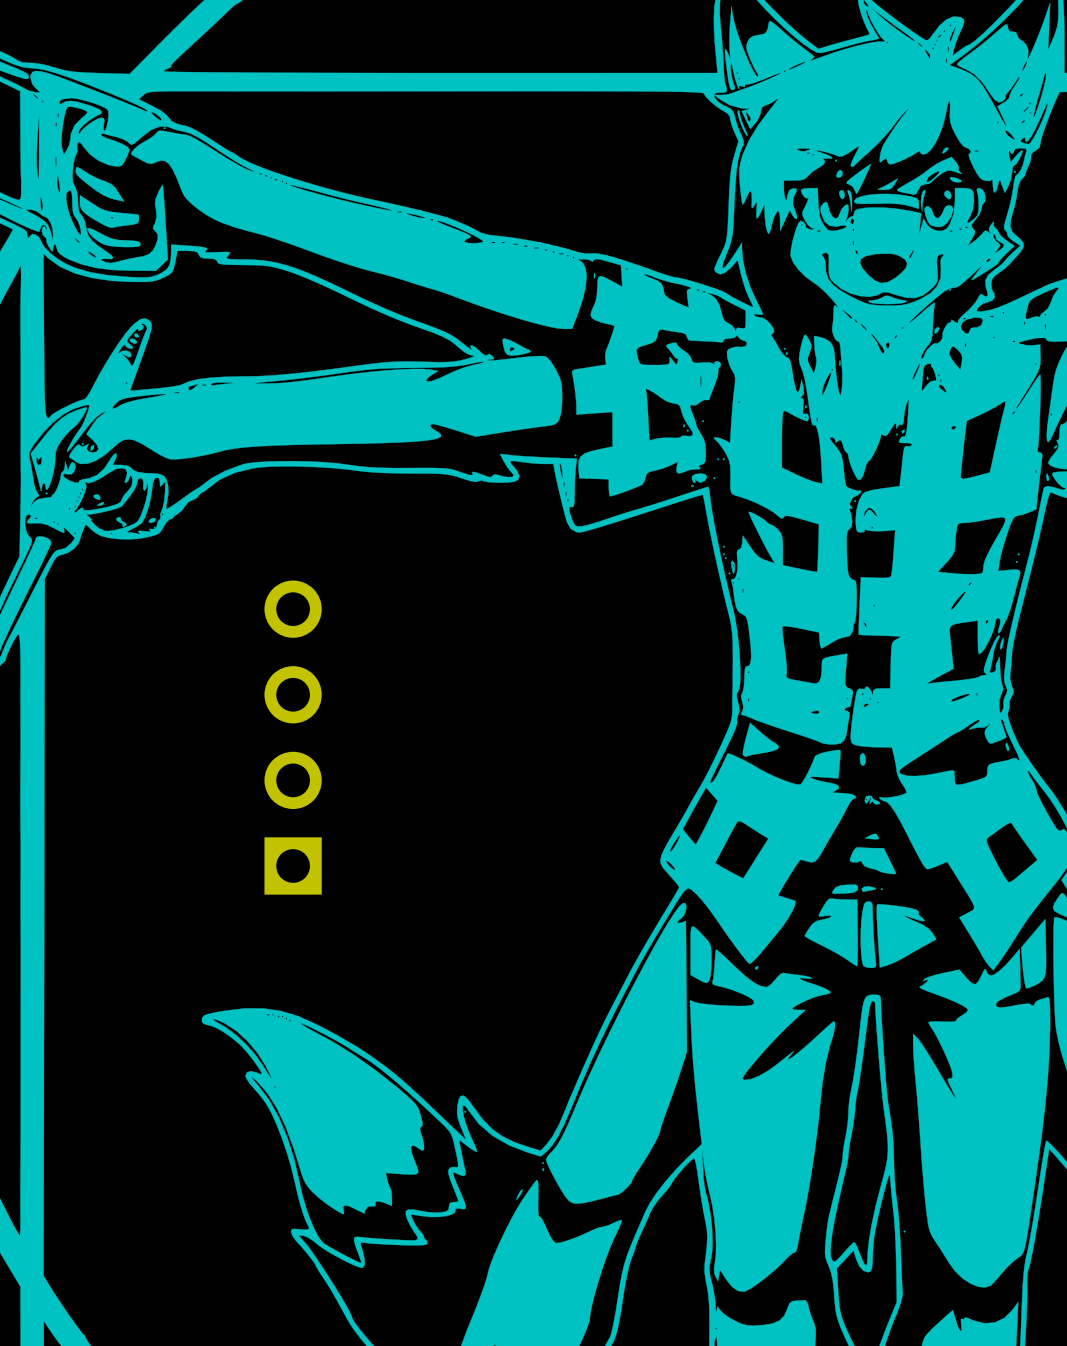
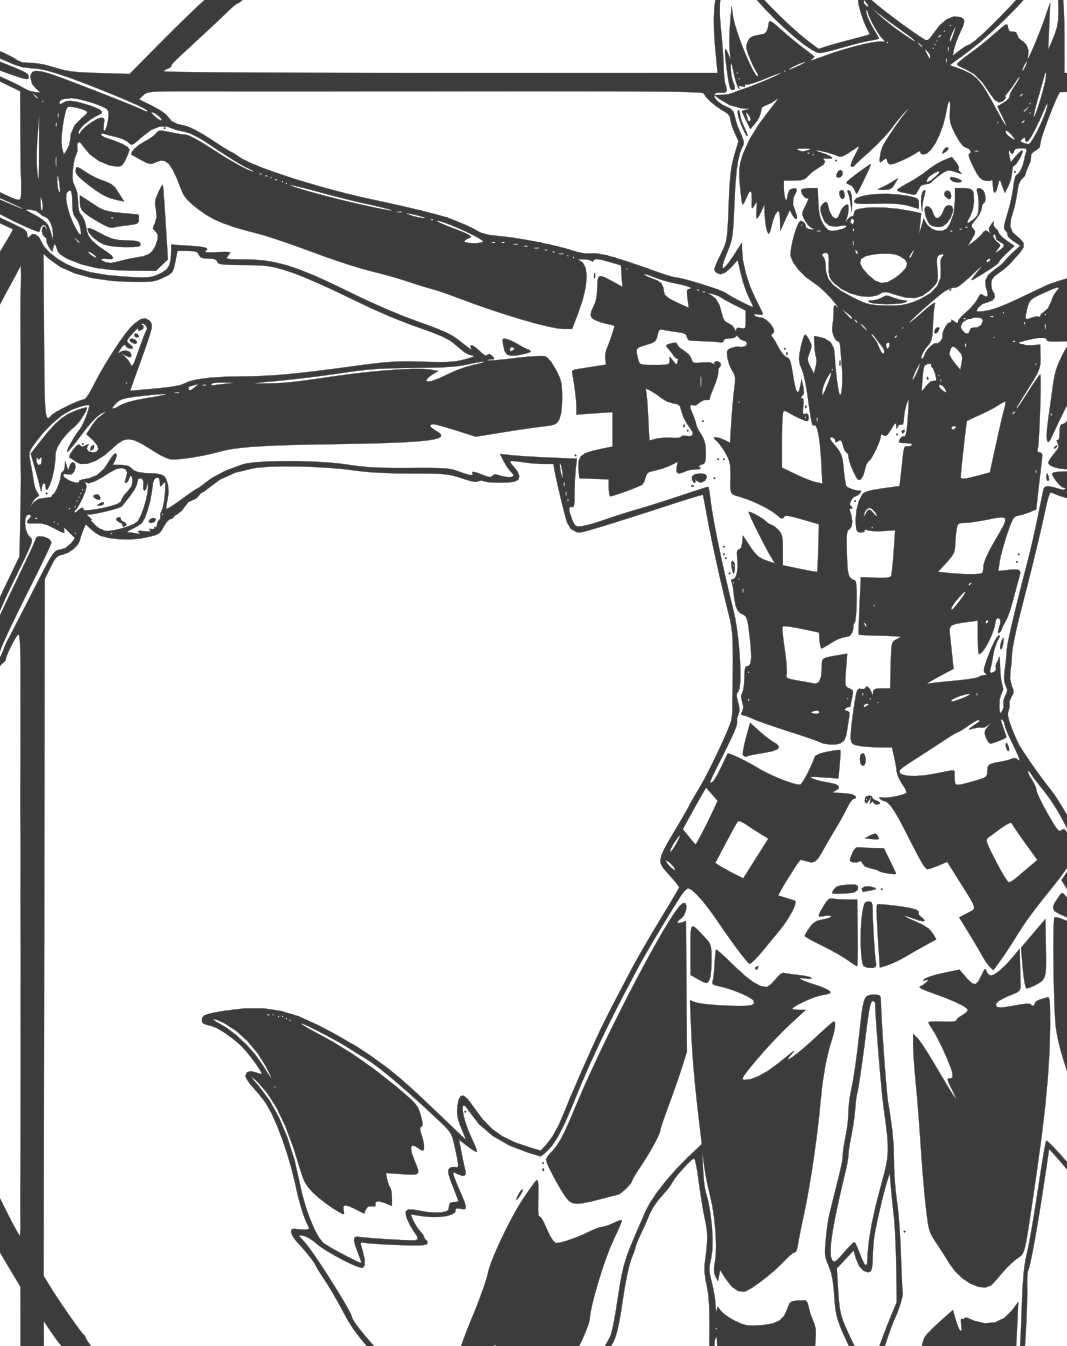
part: (293, 737) -> none

